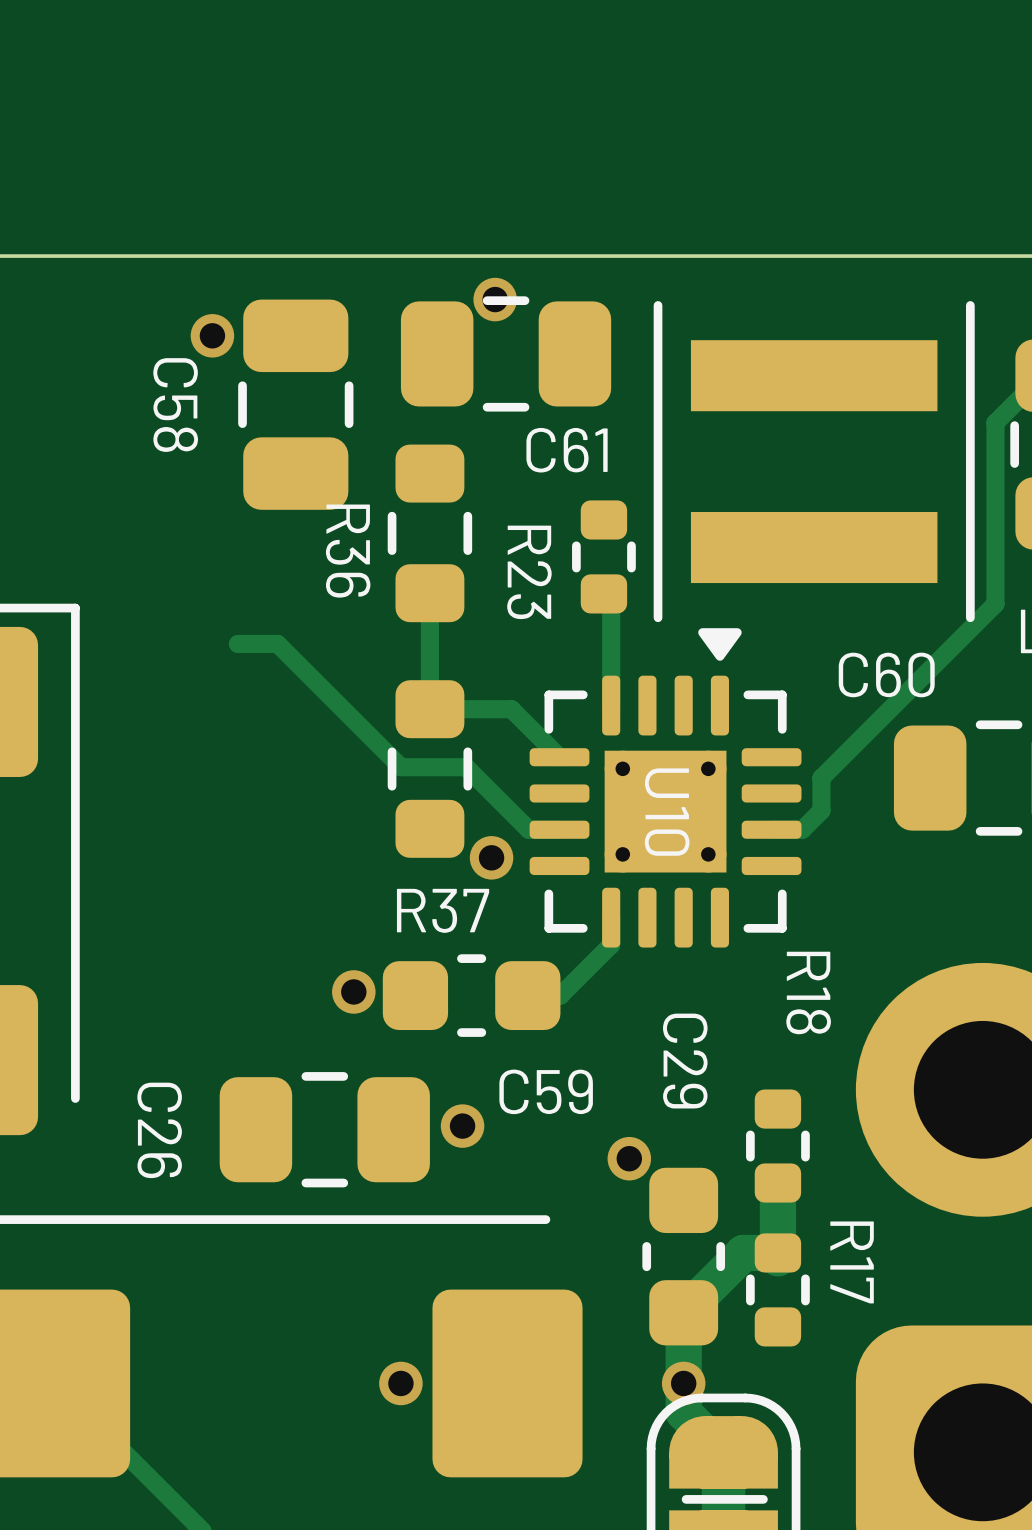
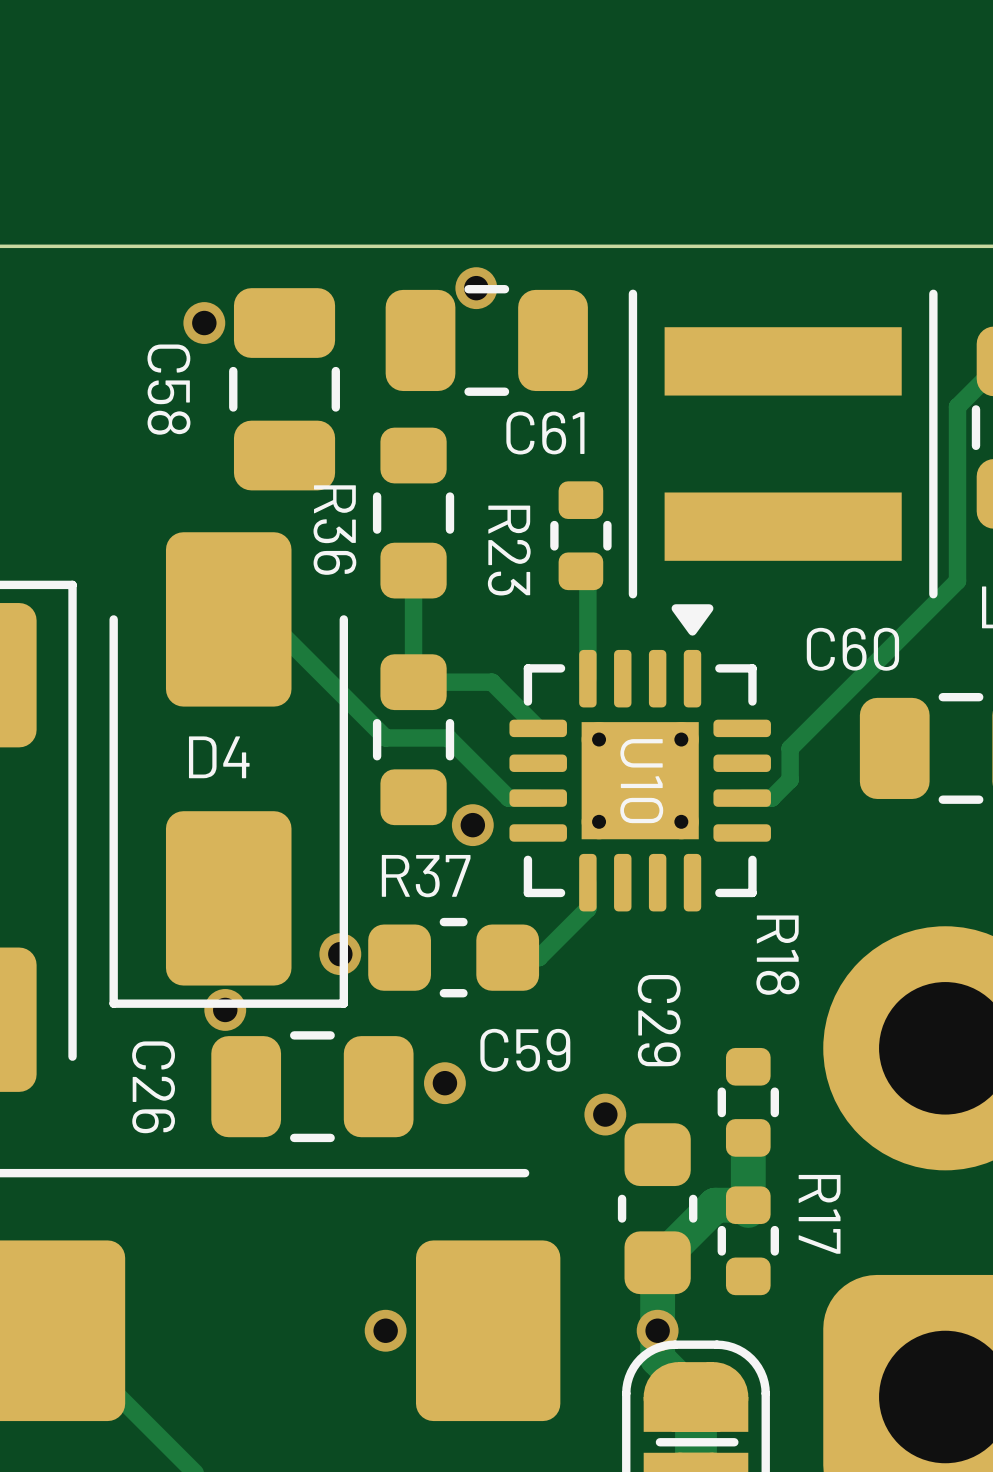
D4: none -> (228, 770)
via: none -> (225, 1009)

